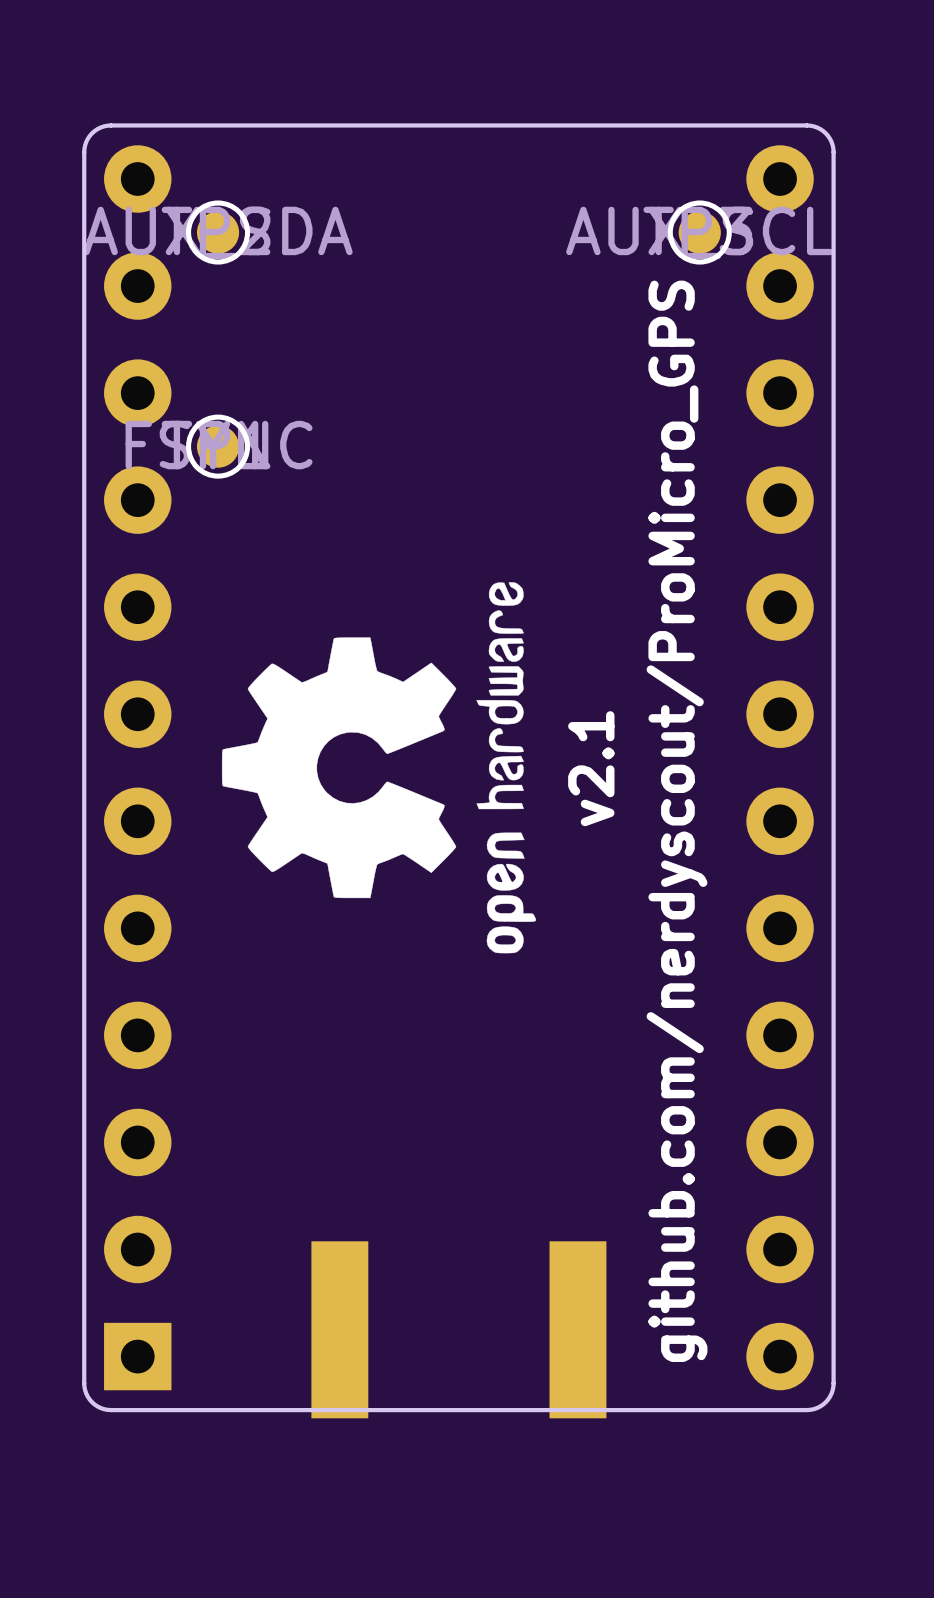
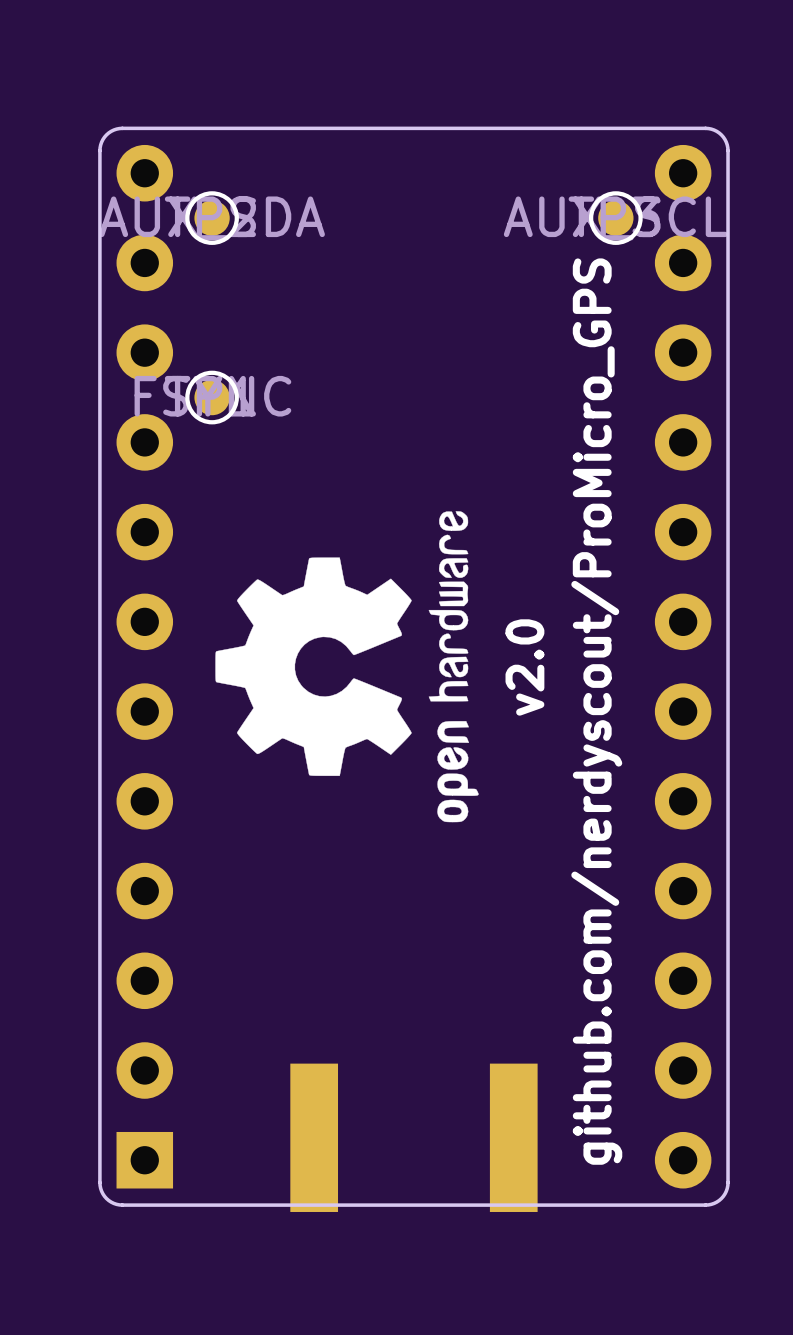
text: v2.1 (591, 768) -> v2.0 (524, 667)

